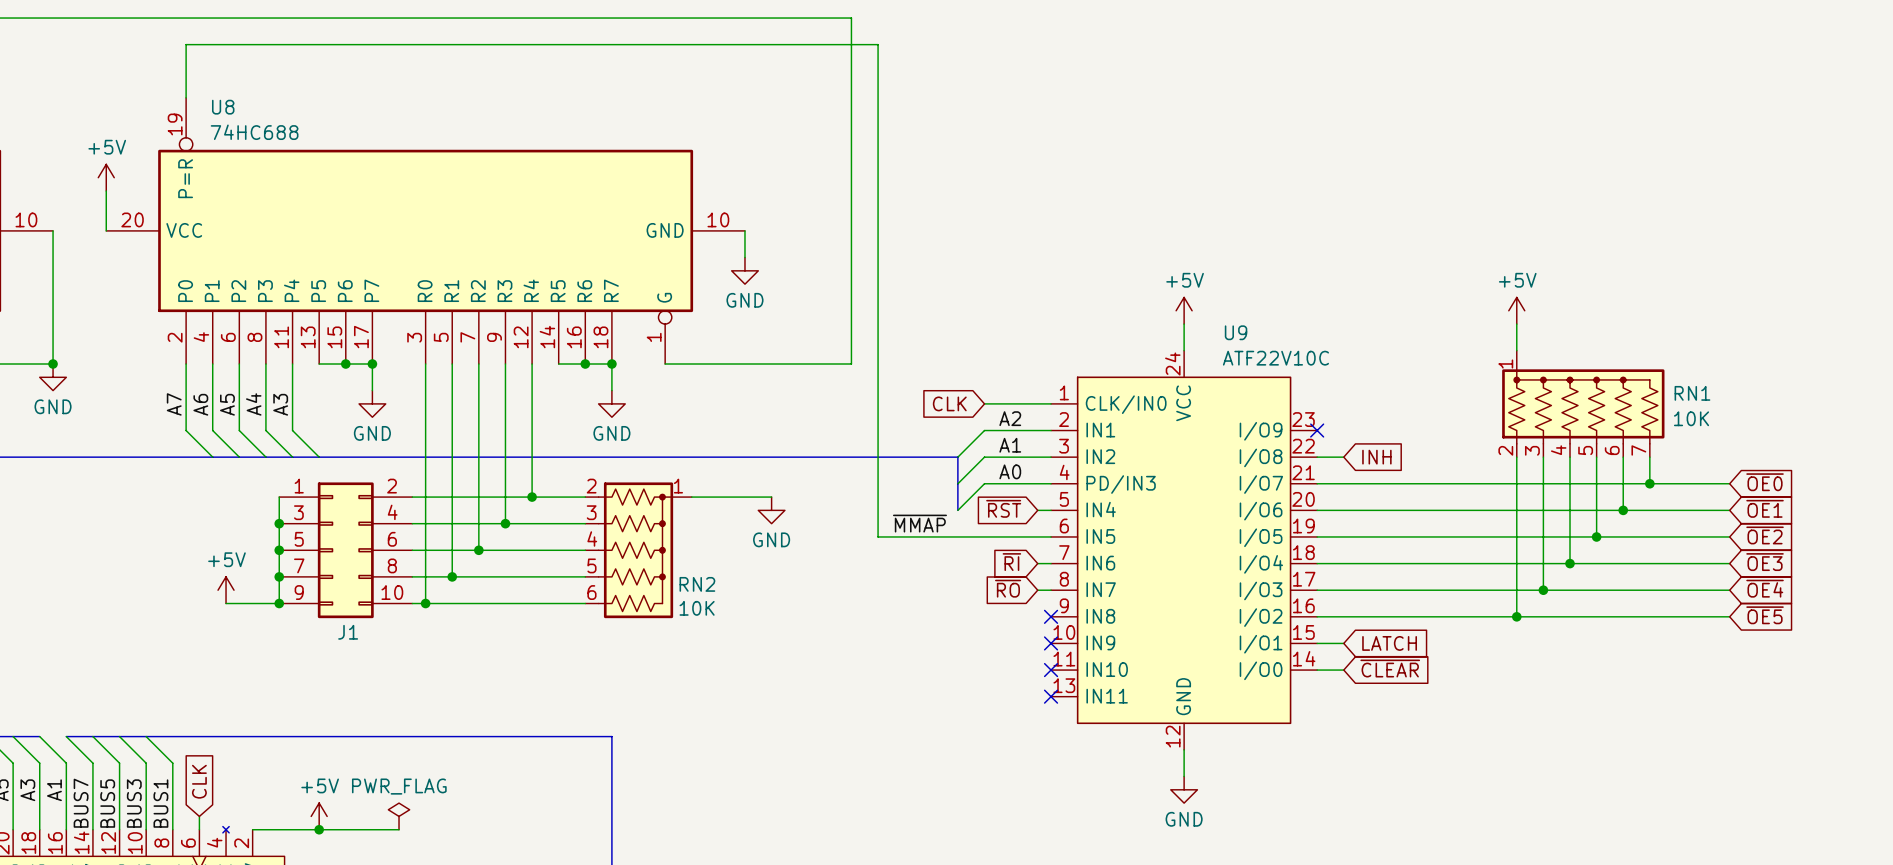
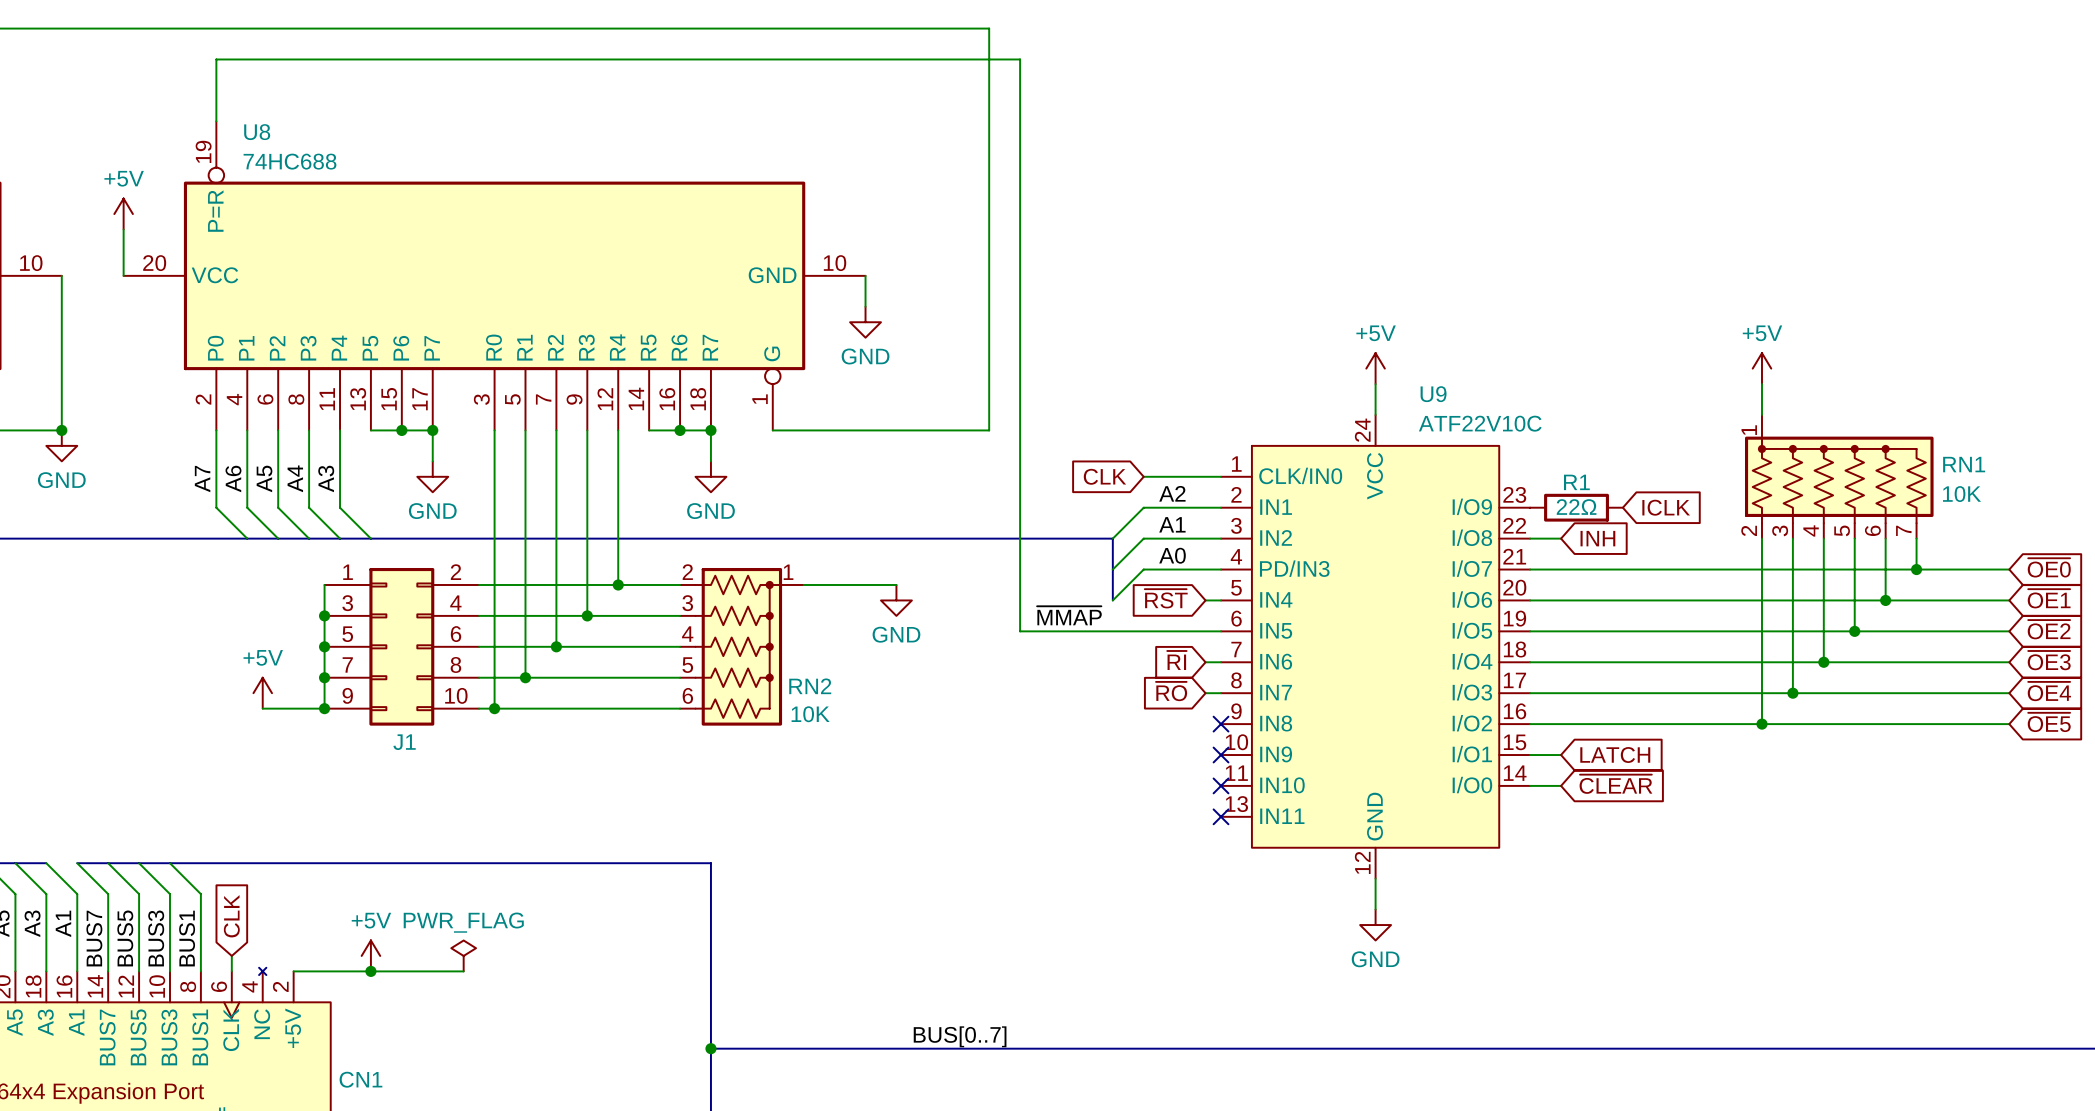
no-connect mark: (1317, 430) -> none
R1: none -> 22Ω (1576, 507)
global label: none -> ICLK (1666, 507)

